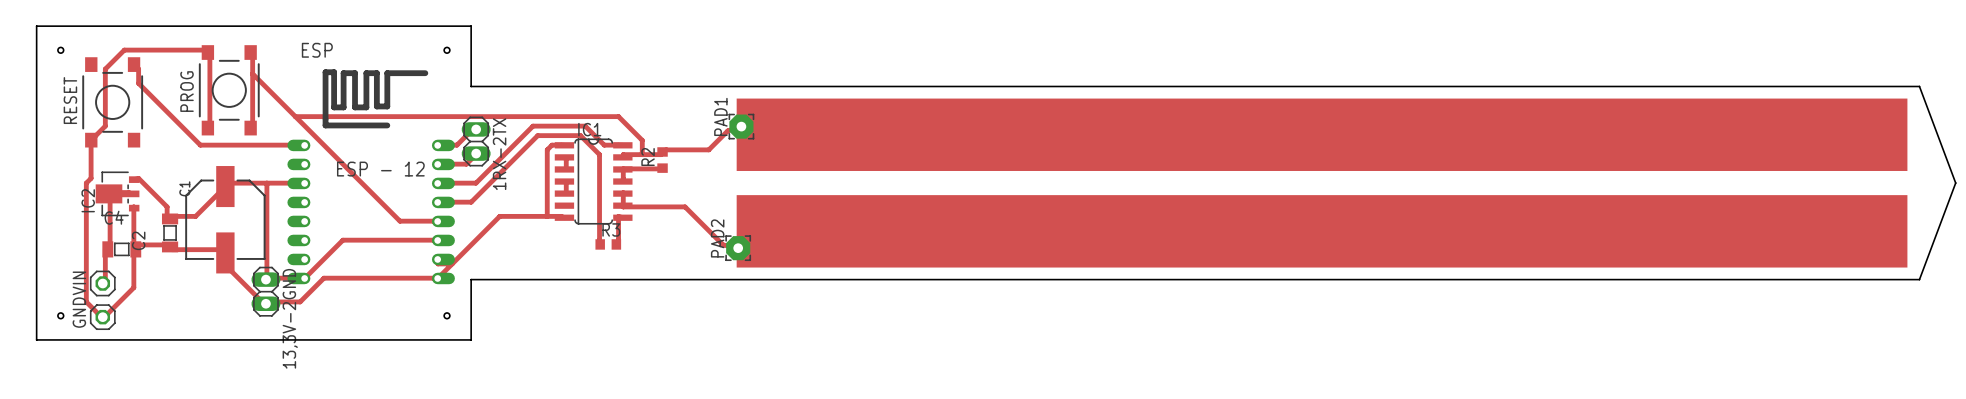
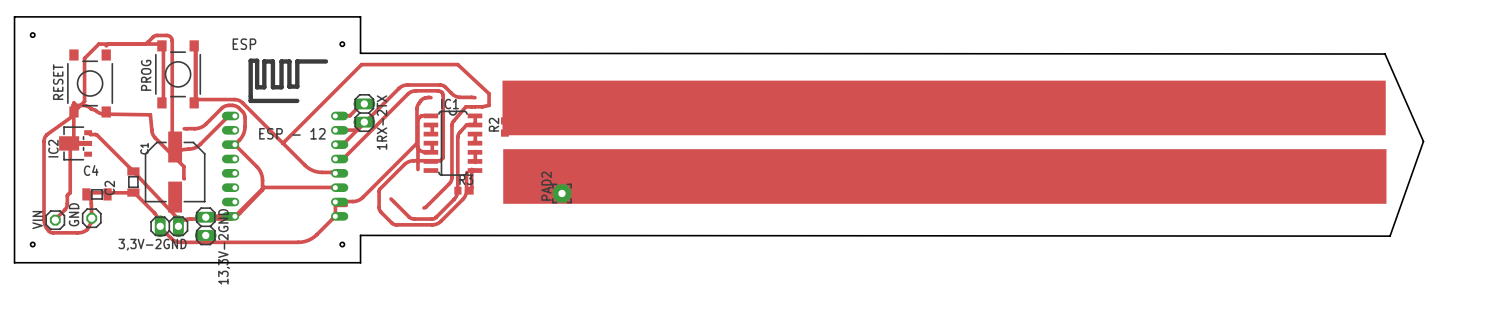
board edge: (471, 26) (36, 26) (36, 339) -> (360, 25) (360, 16) (14, 16) (14, 262) (32, 262)
hole position: (60, 50) -> (32, 35)
board edge: (471, 62) (471, 86) (1919, 86) (1955, 183) (1919, 279) (471, 279) (471, 303) -> (360, 53) (1385, 54) (1423, 141) (1390, 236) (360, 235)
track: (134, 64) (138, 69) (138, 83) (200, 145) (304, 145) -> (106, 45) (108, 44) (144, 43) (156, 35) (167, 35) (171, 37) (172, 143) (176, 149) (196, 147) (227, 117) (234, 115)
track: (252, 73) (399, 221) (437, 221) -> (194, 45) (194, 102) (195, 99) (240, 101) (307, 167) (315, 171) (335, 173)
drawing: none -> [502, 80, 1386, 136]
drawing: [736, 98, 1908, 171] -> none
track: (295, 116) (618, 116) (642, 140) (642, 154) -> none
track: none -> (430, 97) (422, 99) (417, 107) (417, 146) (420, 150) (426, 152)
track: (741, 126) (727, 130) (708, 149) (666, 149) (661, 154) (623, 154) (622, 157) -> none
PAD1: (741, 126) -> none
track: (622, 145) (604, 145) (585, 126) (533, 126) (475, 183) (437, 183) -> (474, 97) (456, 96) (441, 85) (404, 85) (344, 143) (335, 144)
track: none -> (474, 115) (474, 125) (466, 125) (458, 135) (456, 195) (436, 217) (432, 219) (411, 218) (391, 199)
track: none -> (184, 128) (202, 126) (225, 106) (233, 105) (238, 107) (244, 115) (244, 128) (242, 136) (234, 144) (259, 170) (262, 189) (232, 218) (189, 218) (181, 221)
track: none -> (88, 132) (97, 135) (181, 221)
track: (662, 168) (623, 168) -> none
track: (134, 179) (138, 178) (167, 206) (167, 216) (170, 218) (171, 216) (195, 216) (228, 183) (304, 183) -> none
track: none -> (282, 143) (361, 64) (457, 64) (489, 93) (489, 105) (465, 106) (452, 122) (451, 179) (423, 207)
track: none -> (416, 143) (361, 198) (354, 201) (335, 201) (335, 216) (314, 236) (305, 241) (177, 241) (161, 228) (155, 213) (133, 192) (90, 192) (90, 223) (87, 229) (82, 232) (52, 232) (45, 225) (44, 139) (46, 134) (72, 116) (73, 102) (76, 105) (87, 106) (102, 114) (150, 114) (153, 135) (183, 166) (184, 178)
track: (266, 183) (266, 278) -> none
drawing: none -> [503, 149, 1387, 204]
IC2 position: (117, 193) -> (75, 143)
track: (130, 193) (109, 193) (110, 244) (107, 249) (105, 249) (105, 282) (102, 283) -> none
drawing: [736, 195, 1908, 268] -> none
track: (437, 202) (471, 202) (537, 135) (580, 135) (599, 154) (600, 244) -> (335, 158) (344, 157) (409, 92) (414, 90) (438, 90) (443, 94) (443, 157) (440, 160) (412, 160) (405, 163) (379, 189) (379, 210) (394, 224) (437, 223) (464, 196) (467, 172)
track: (623, 206) (685, 206) (723, 244) (738, 248) -> none
track: (134, 208) (133, 244) (135, 249) -> none
track: (564, 217) (499, 216) (437, 278) (323, 278) (300, 301) (266, 301) (265, 303) (262, 301) (228, 268) (228, 254) (224, 249) (171, 249) (167, 244) (138, 244) (135, 249) -> none
track: (86, 247) (86, 301) (102, 317) (133, 287) (133, 249) (135, 249) -> (70, 192) (67, 195) (66, 208) (55, 220)
VIN position: (102, 283) -> (55, 220)
3,3V-2GND: none -> (169, 226)
hole position: (60, 315) -> (32, 244)
GND position: (102, 317) -> (91, 218)

